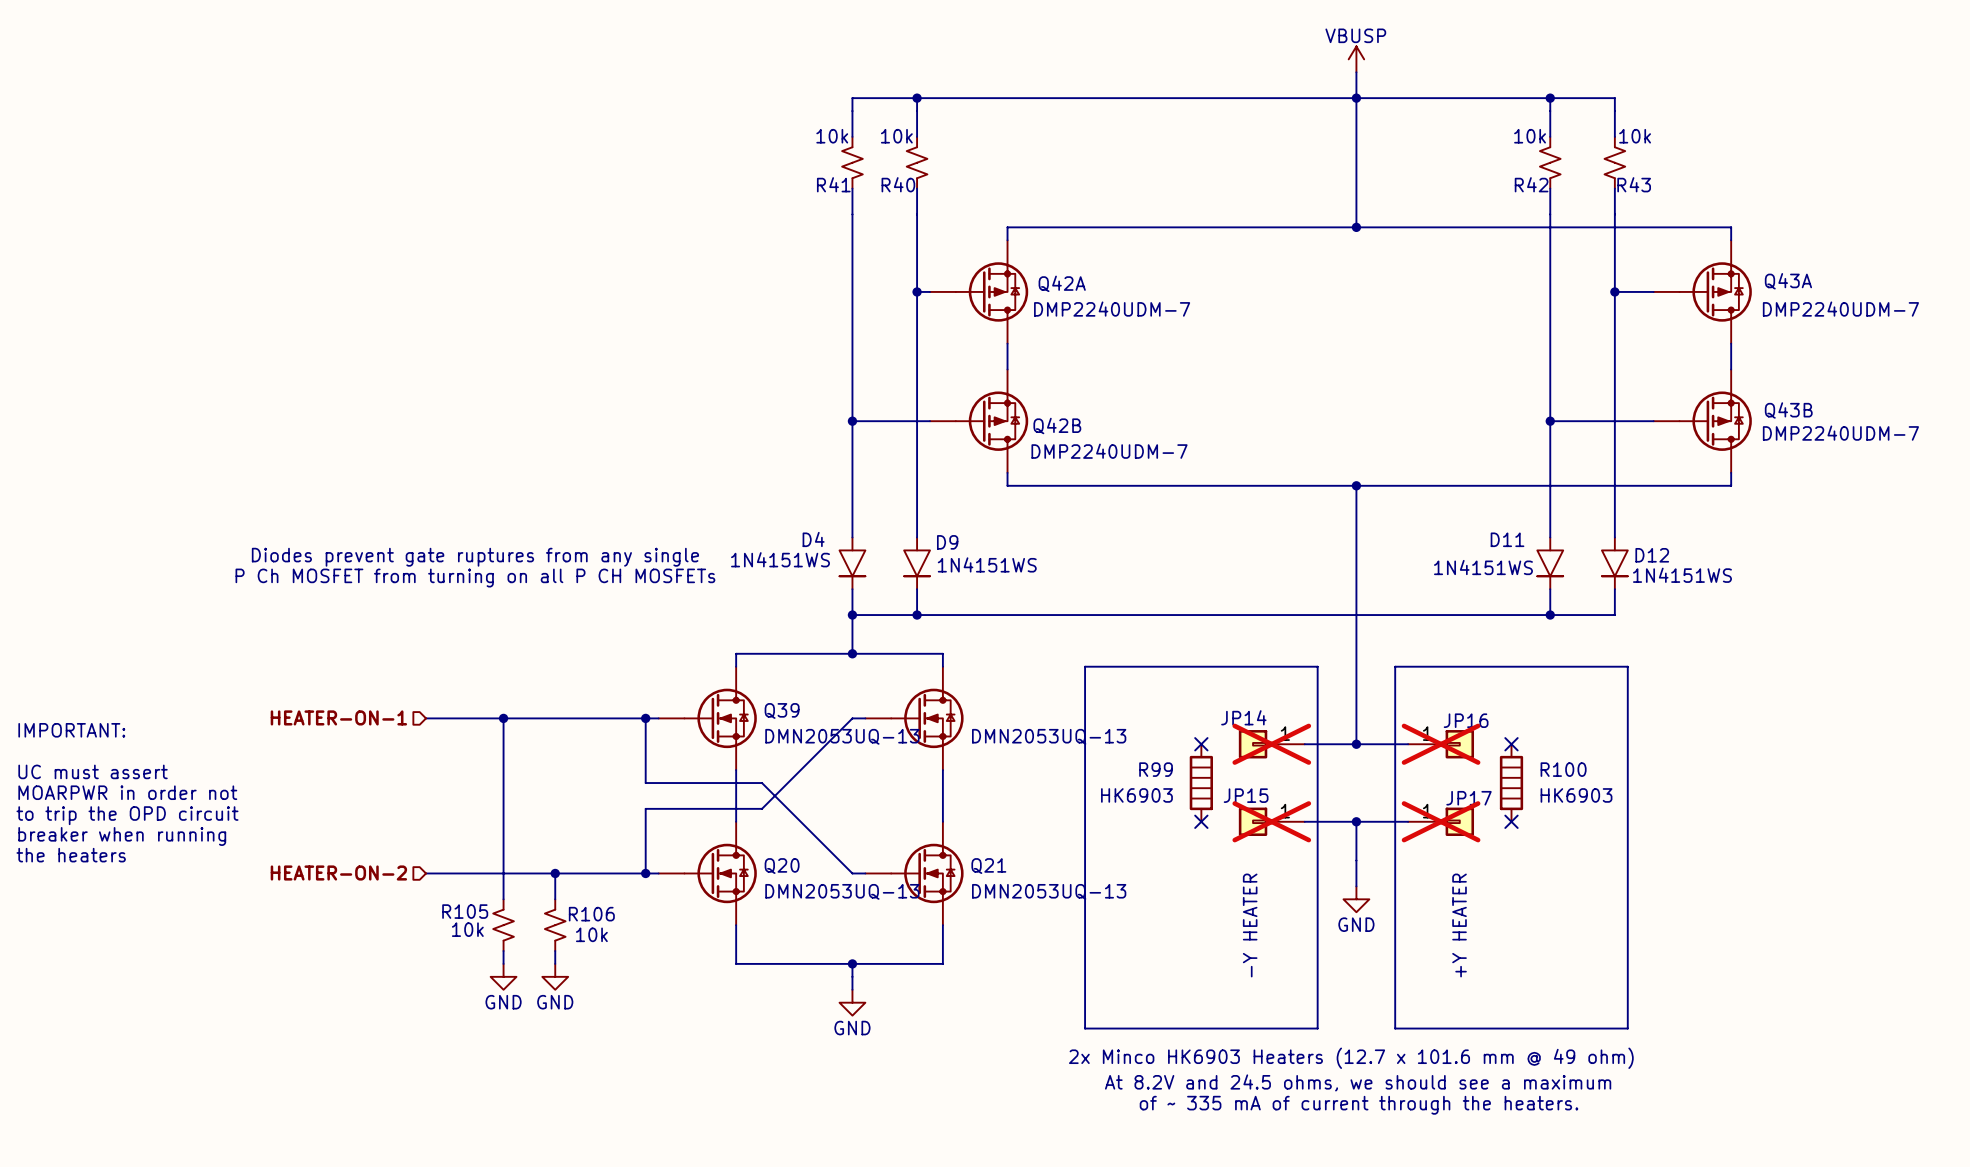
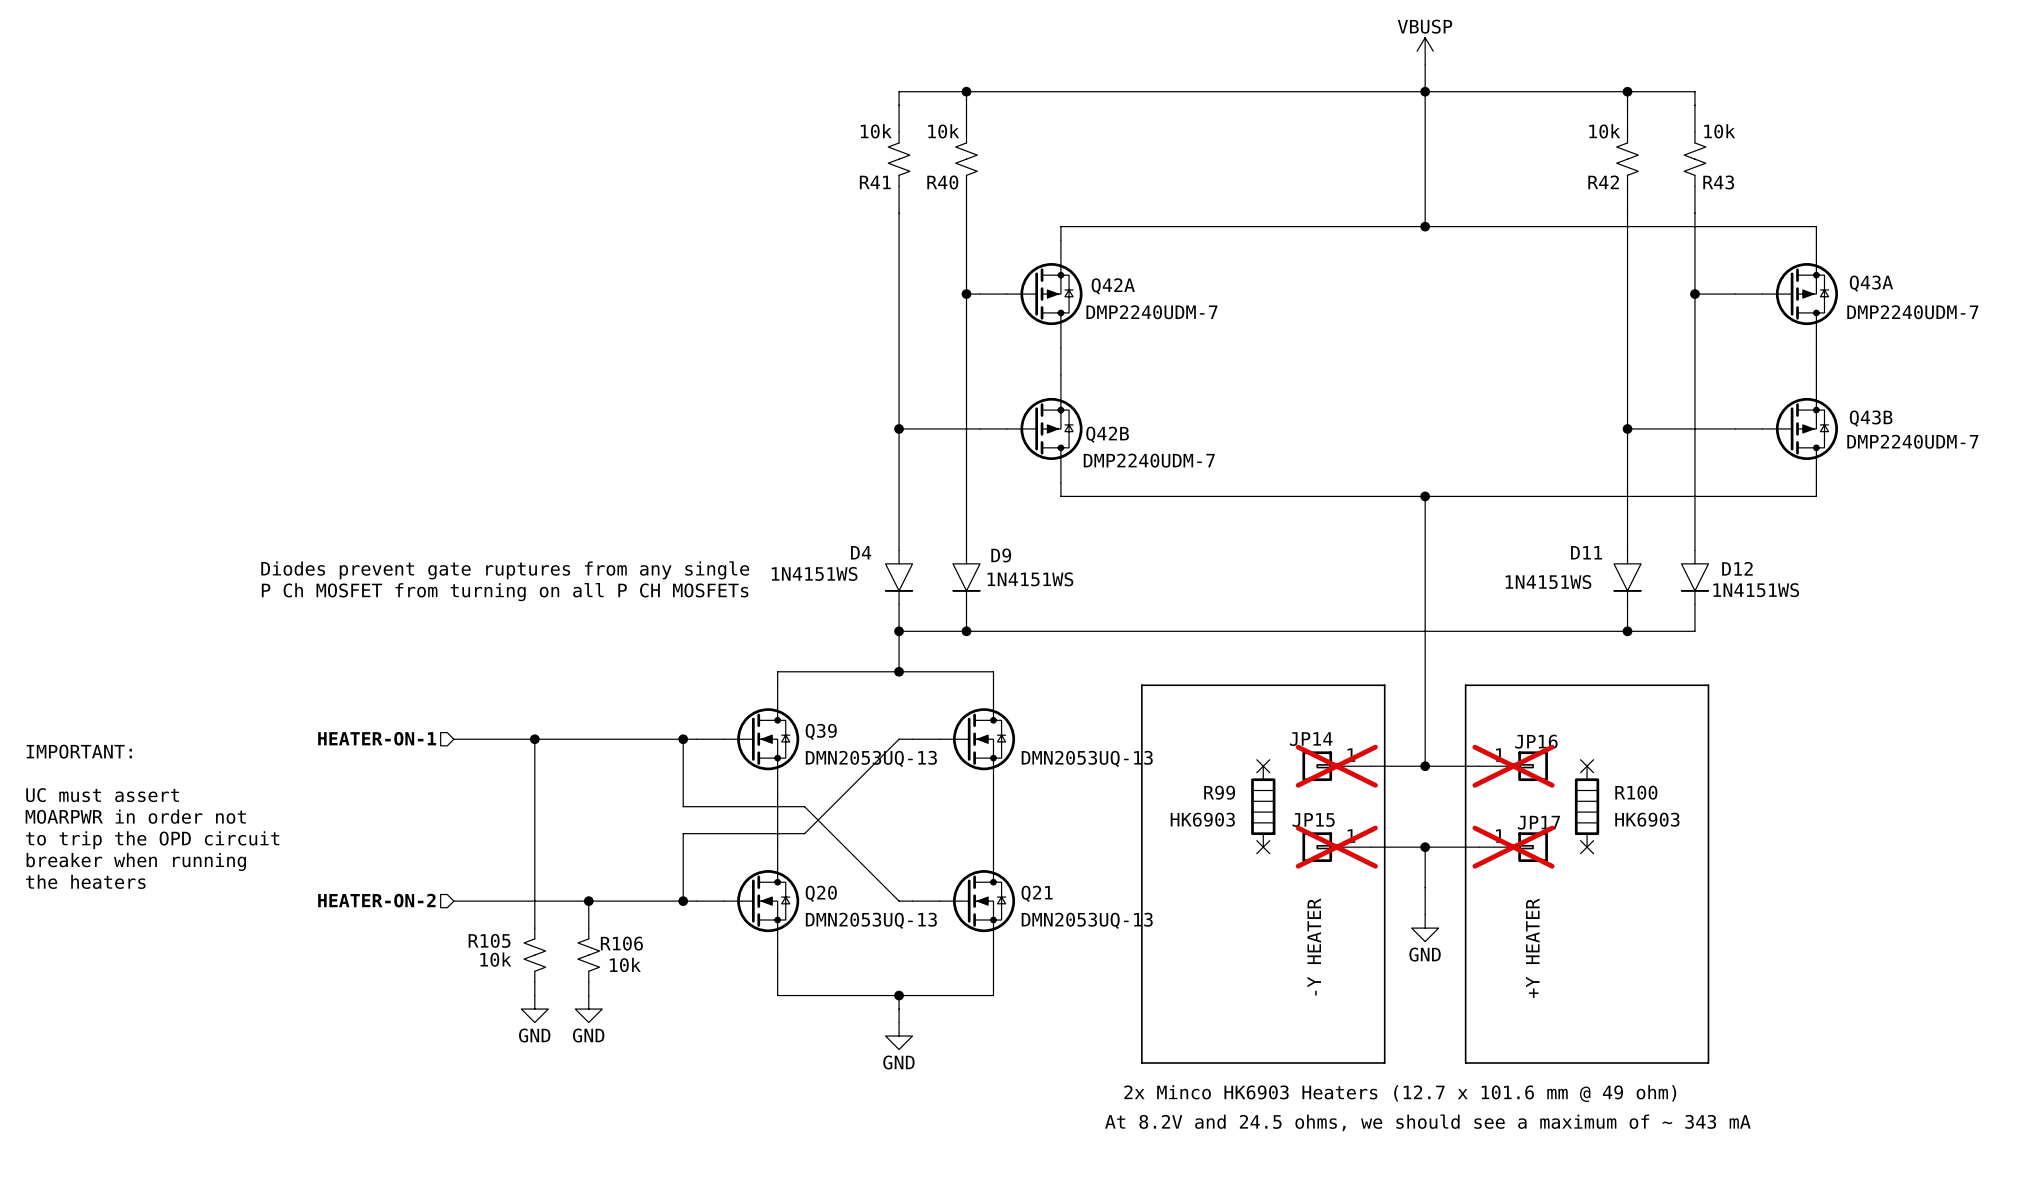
text: At 8.2V and 24.5 ohms, we should see a maximum (1358, 1082) -> At 8.2V and 24.5 ohms, we should see a maximum of ~ 343 mA (1427, 1122)
text: of ~ 335 mA of current through the heaters. (1359, 1105) -> none

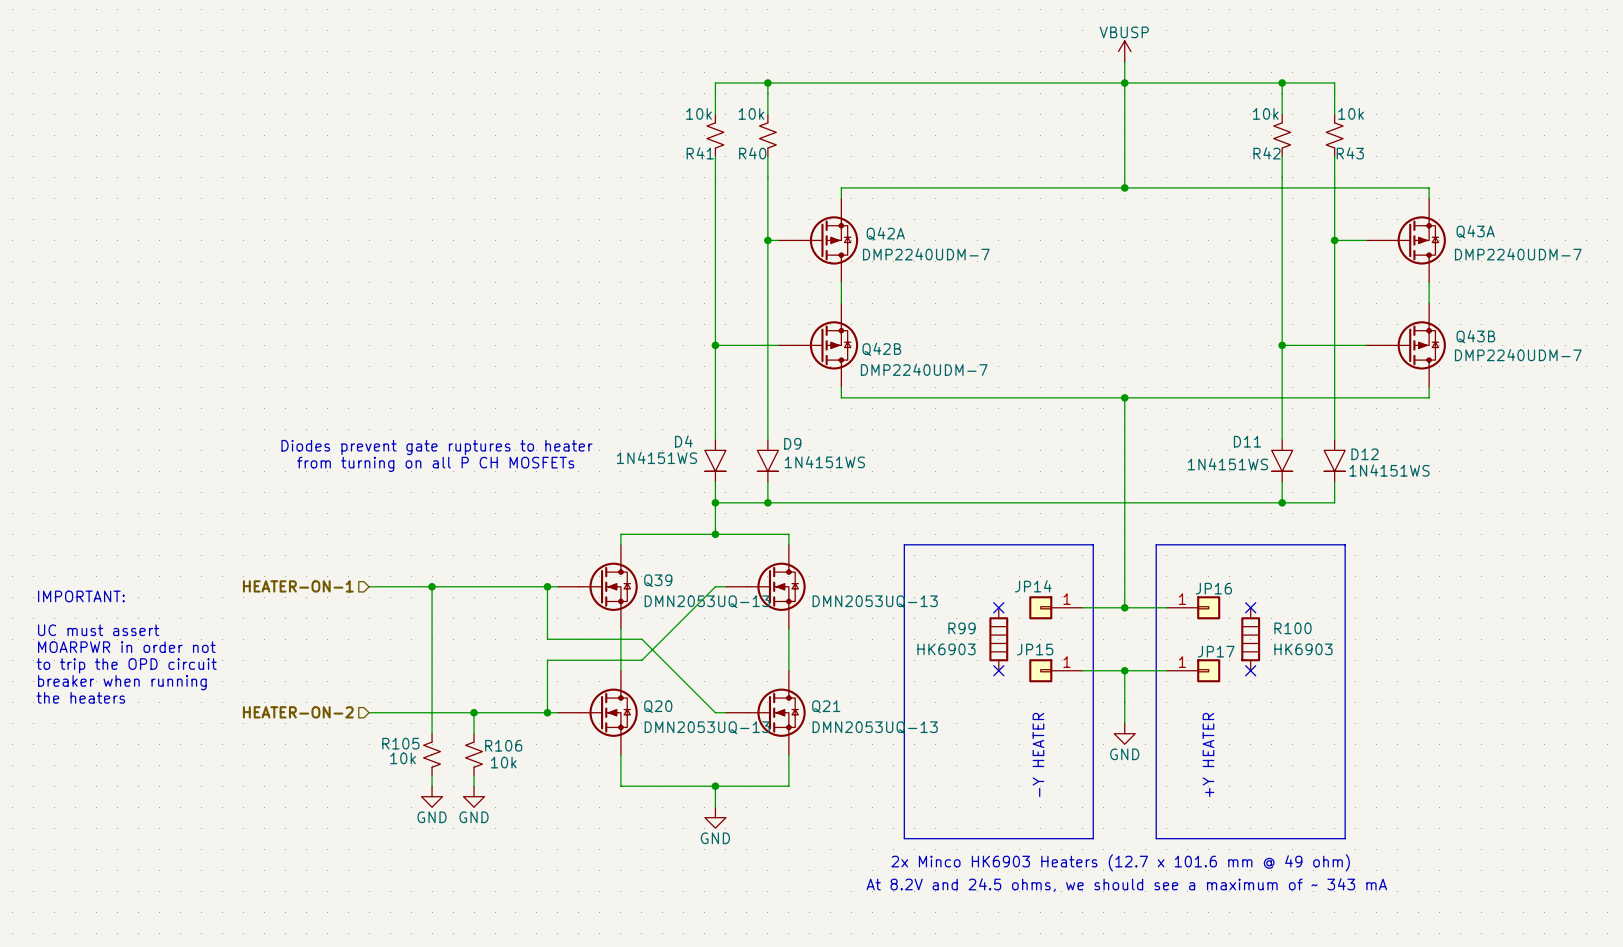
text: Diodes prevent gate ruptures from any single (505, 570) -> Diodes prevent gate ruptures to heater (436, 447)
text: P Ch MOSFET from turning on all P CH MOSFETs (505, 592) -> from turning on all P CH MOSFETs (435, 464)
JP14 do-not-place cross: (1336, 766) -> none
JP16 do-not-place cross: (1513, 766) -> none
JP15 do-not-place cross: (1336, 847) -> none
JP17 do-not-place cross: (1513, 847) -> none

